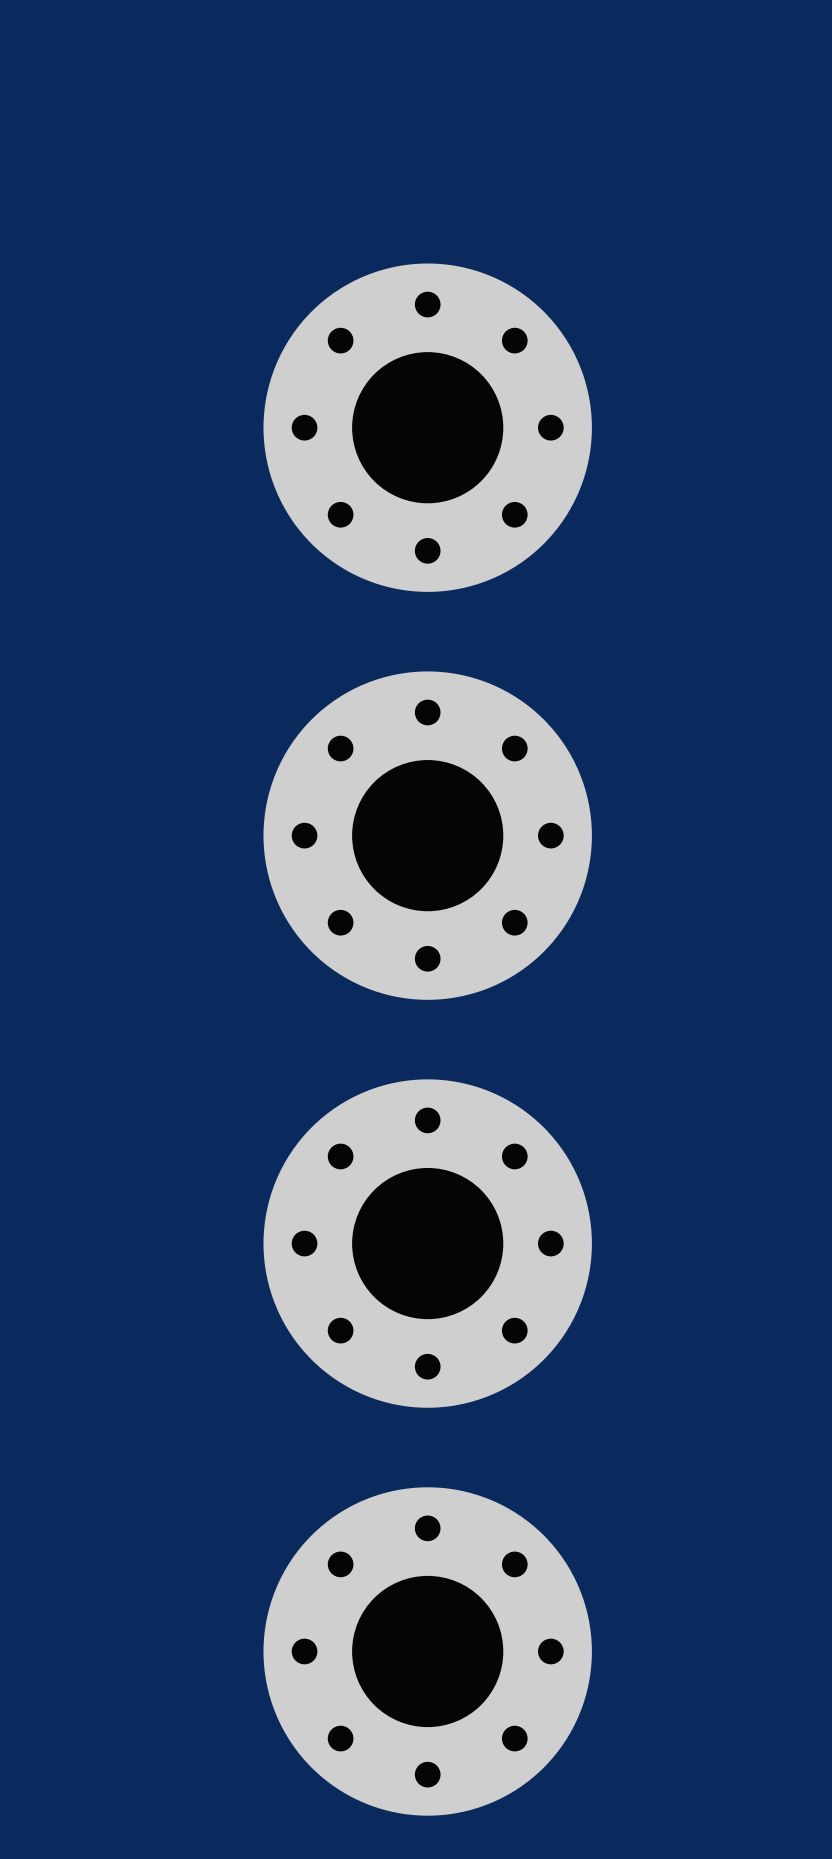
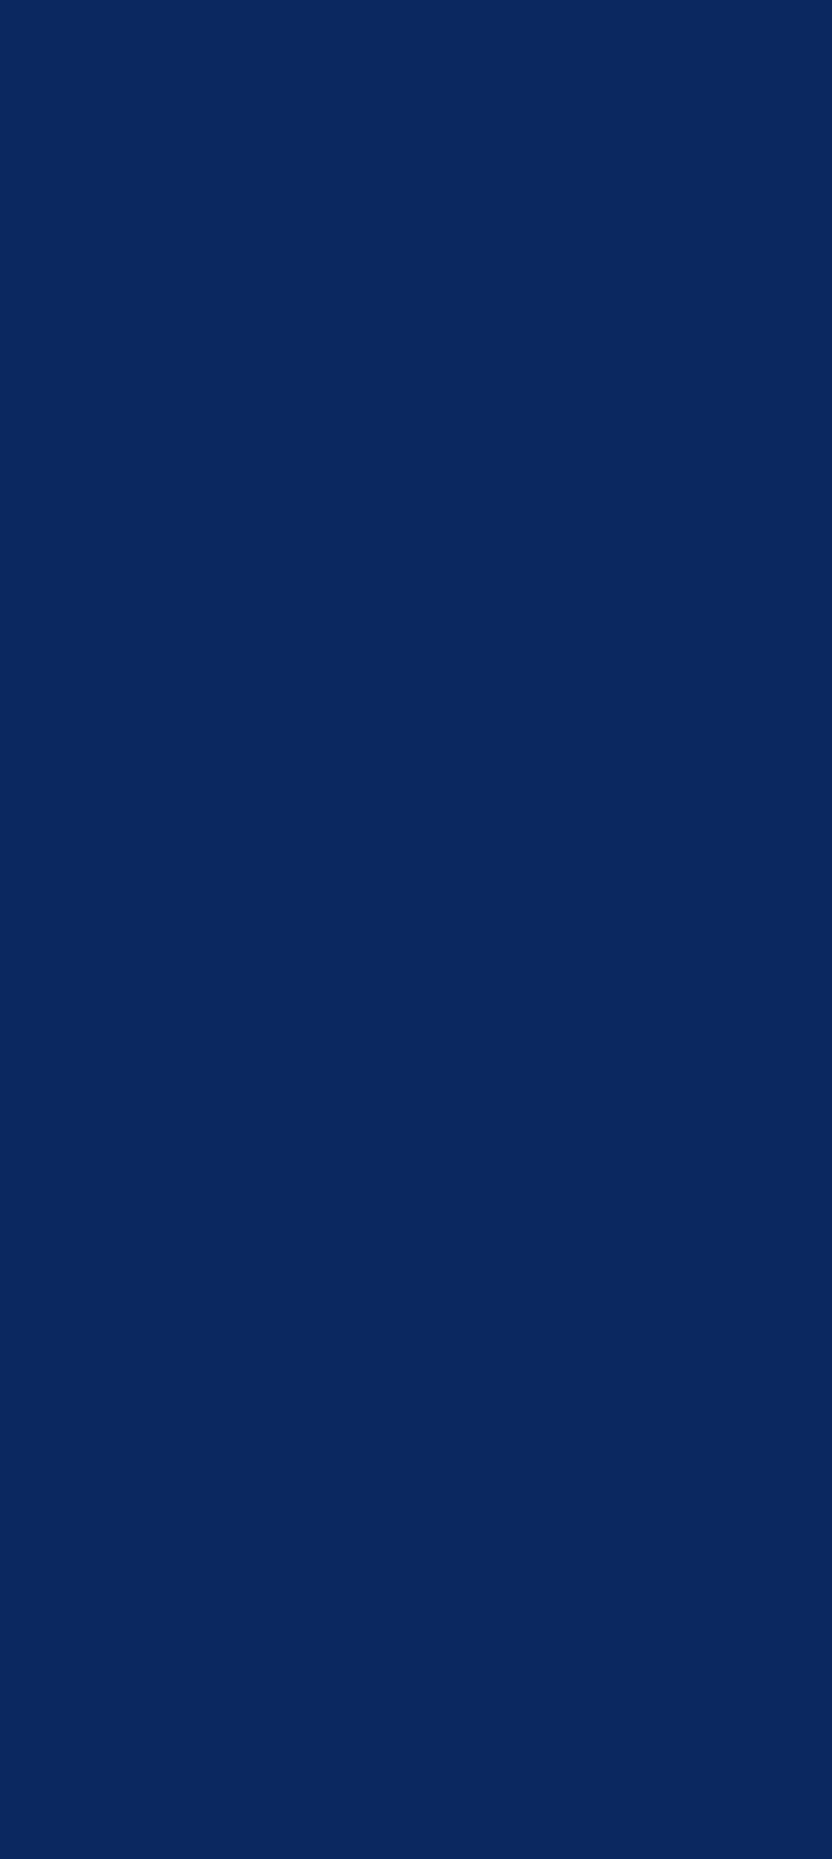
part: (427, 427) -> none
part: (427, 835) -> none
part: (427, 1243) -> none
part: (427, 1651) -> none

